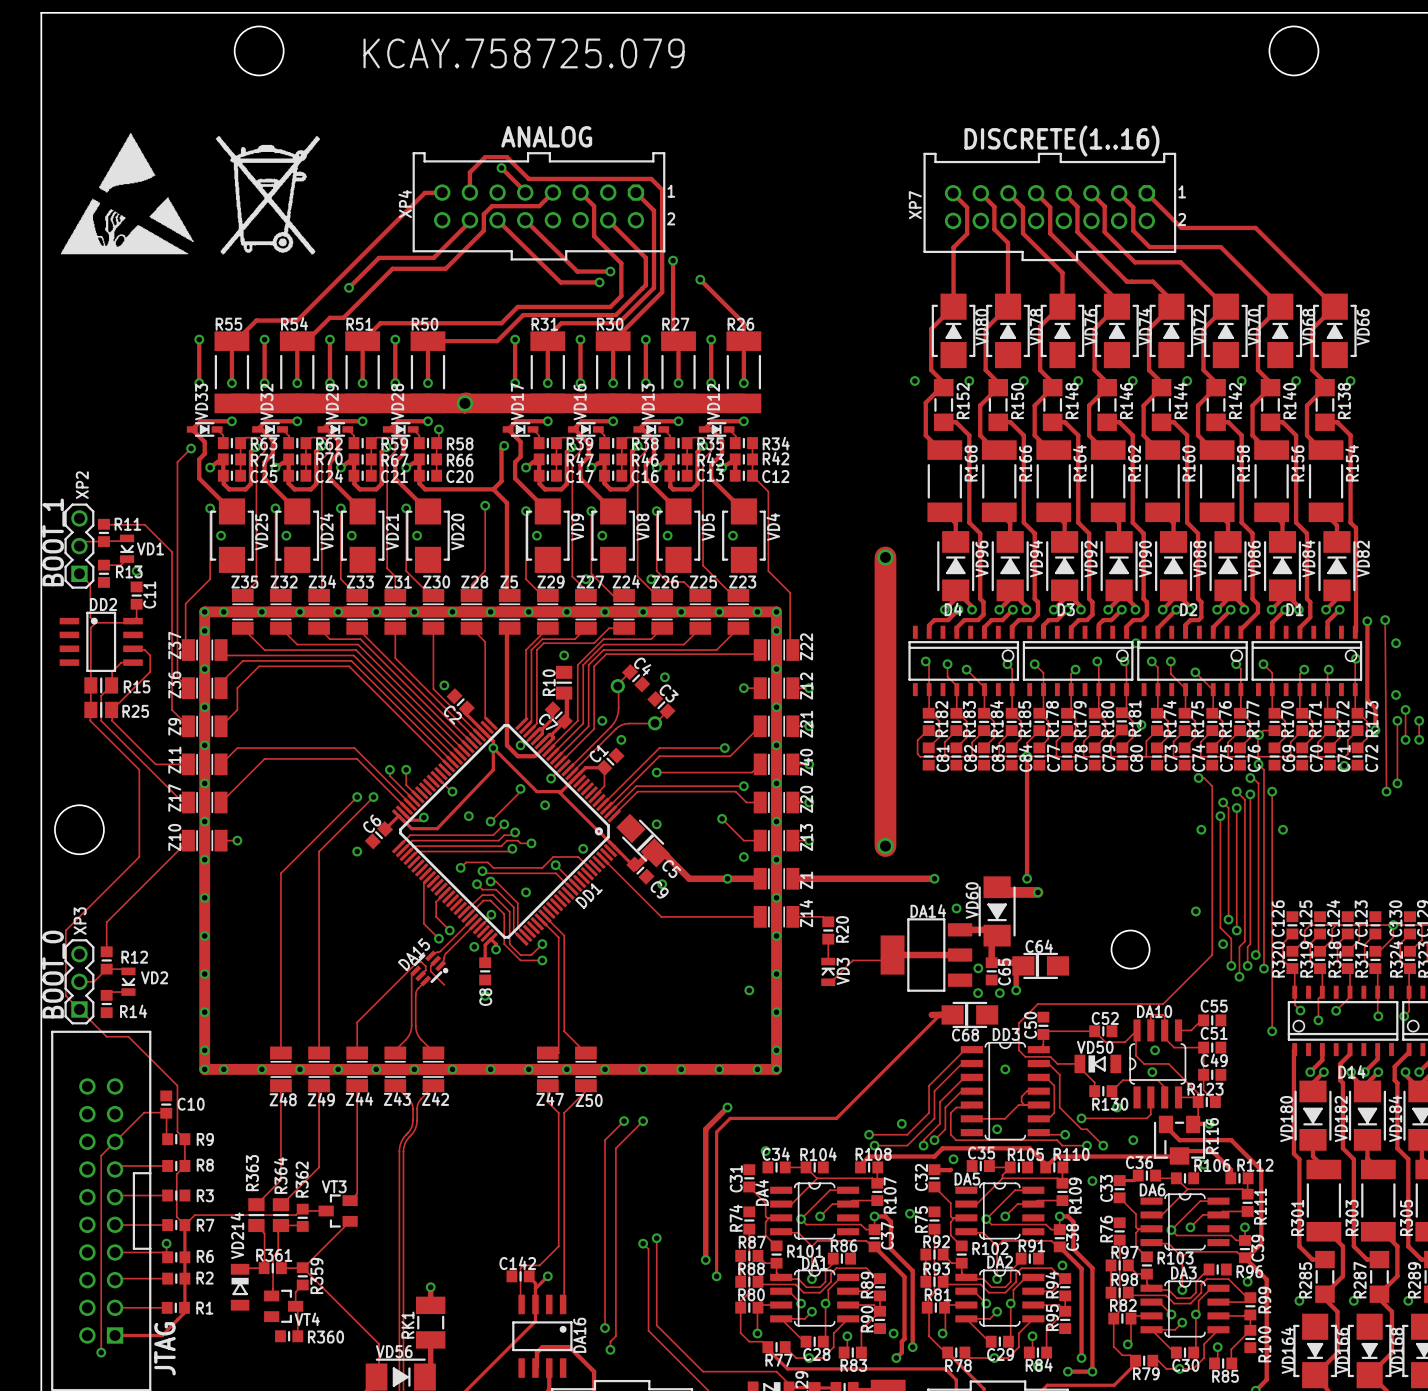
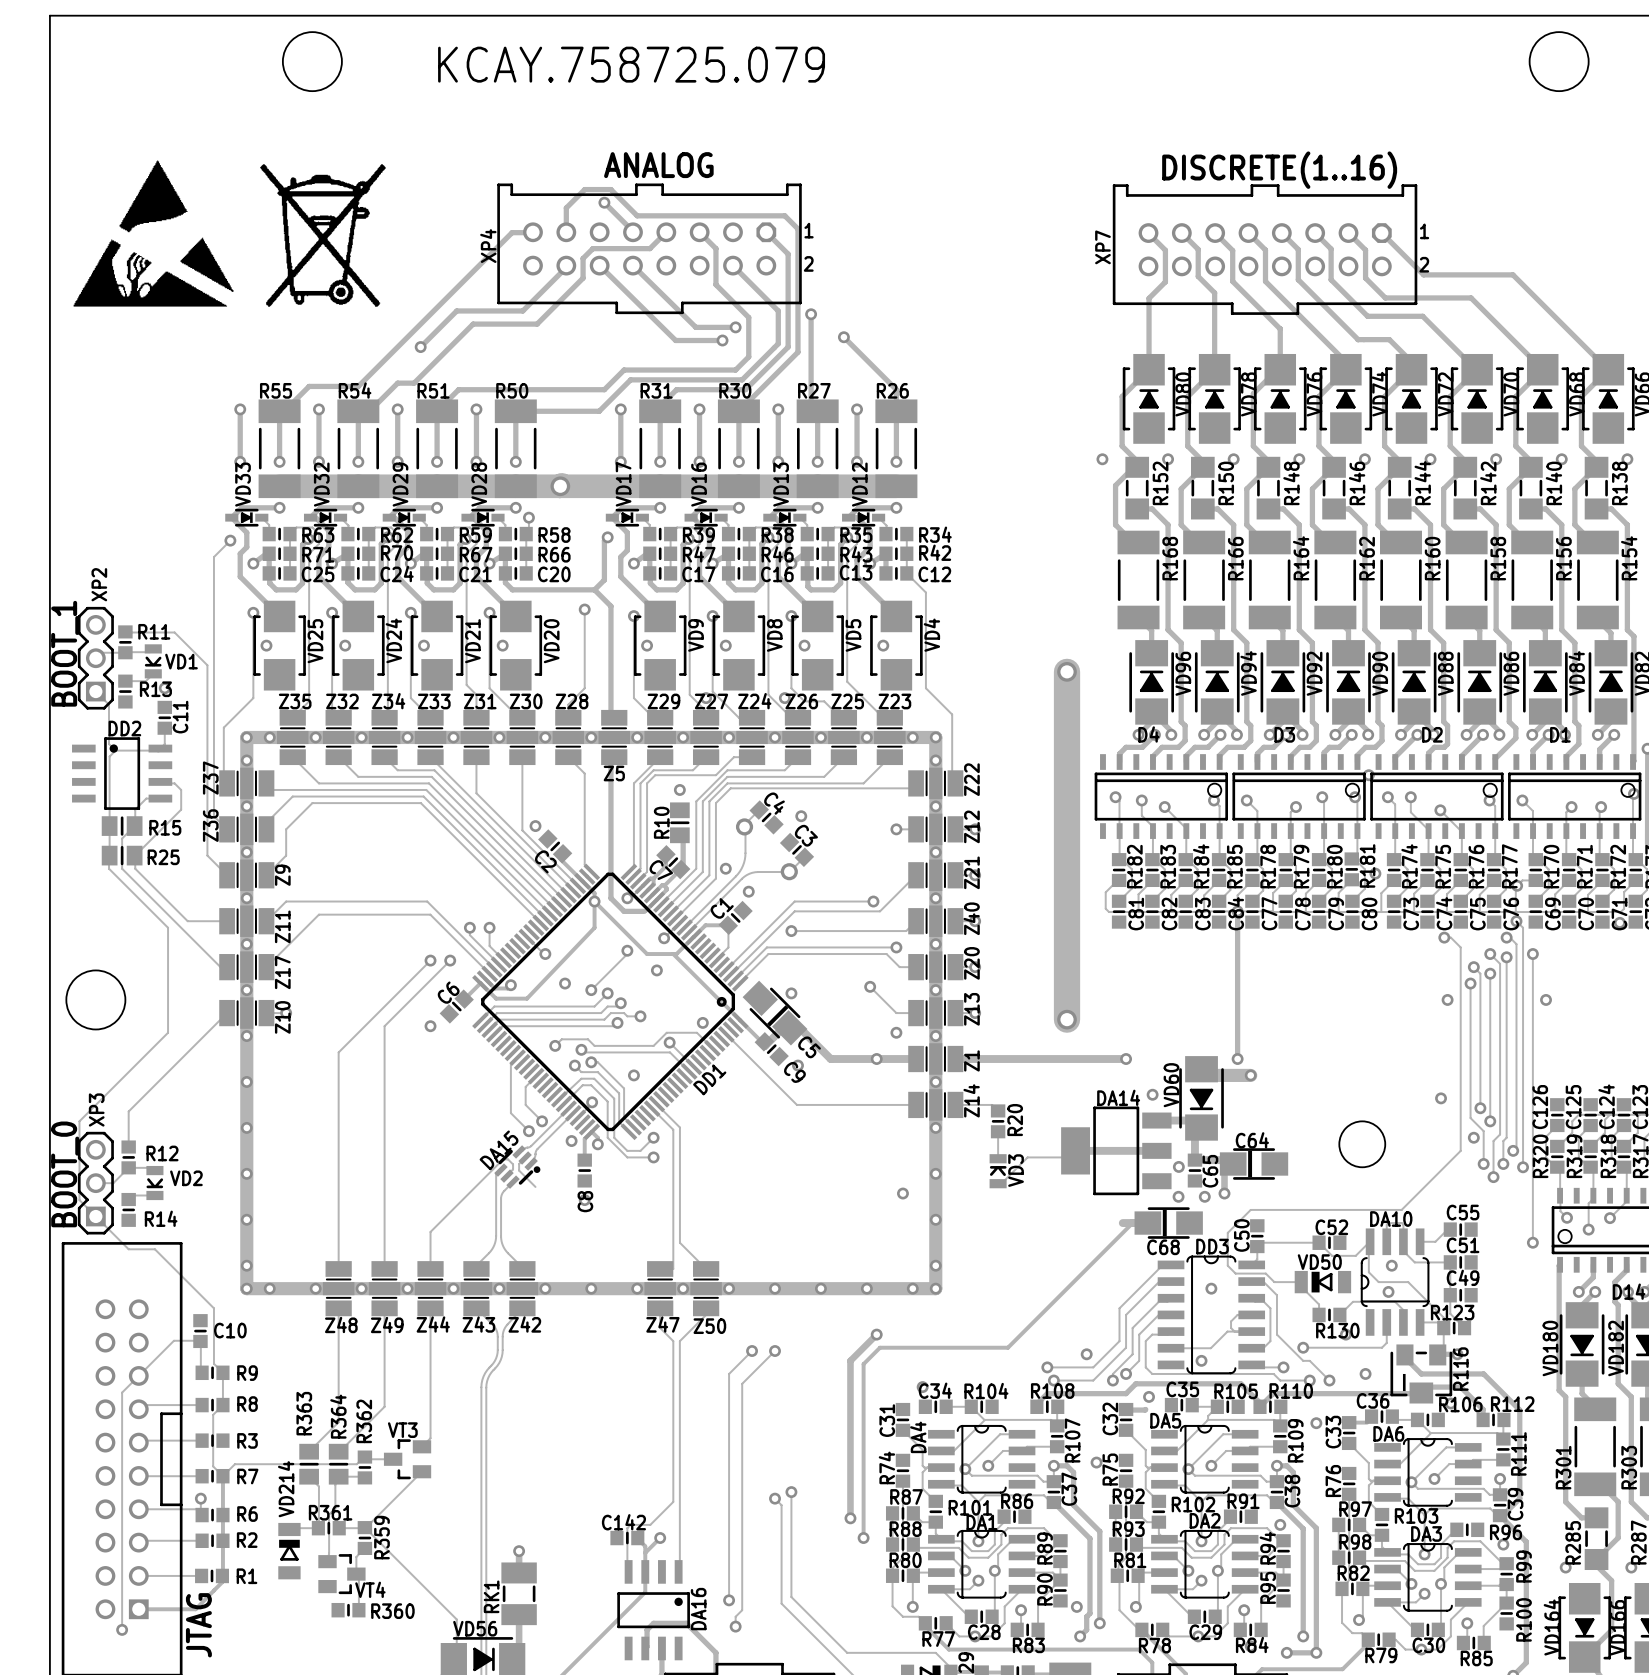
Z5 name position: Z5 (509, 582) -> Z5 (614, 773)
Z9 name position: Z9 (174, 726) -> Z9 (282, 875)
Z11 name position: Z11 (174, 760) -> Z11 (282, 926)
Z17 name position: Z17 (174, 798) -> Z17 (282, 972)
Z10 name position: Z10 (174, 837) -> Z10 (282, 1017)

